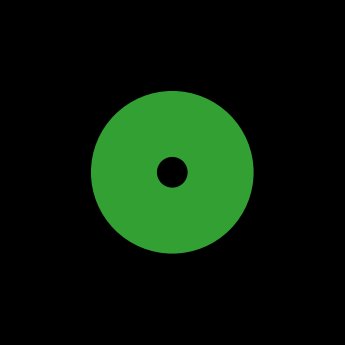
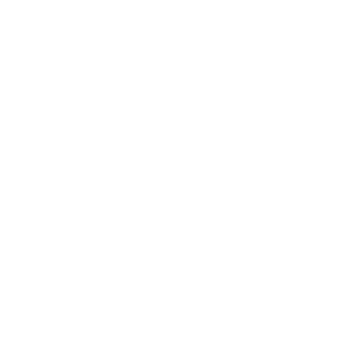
part: (172, 172) -> none

